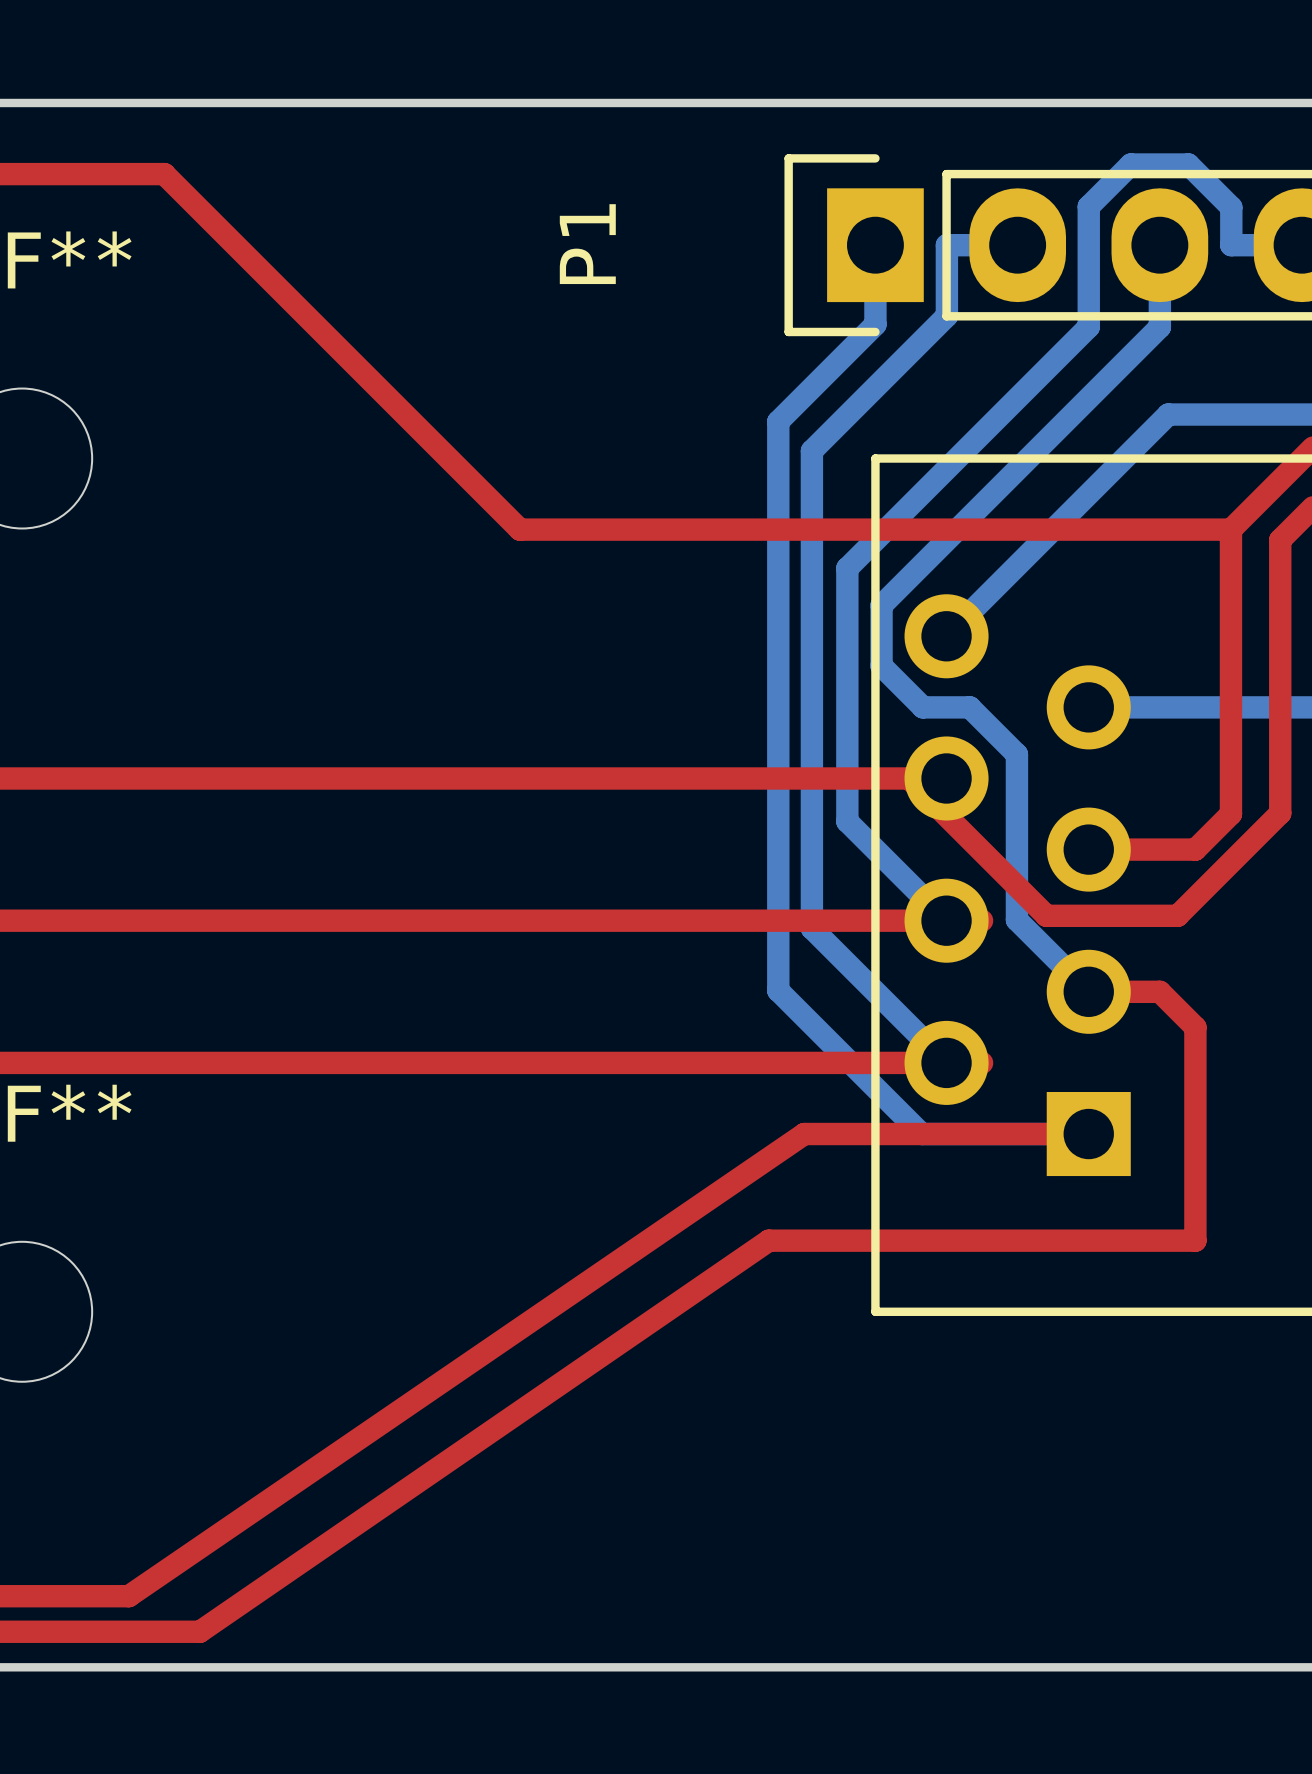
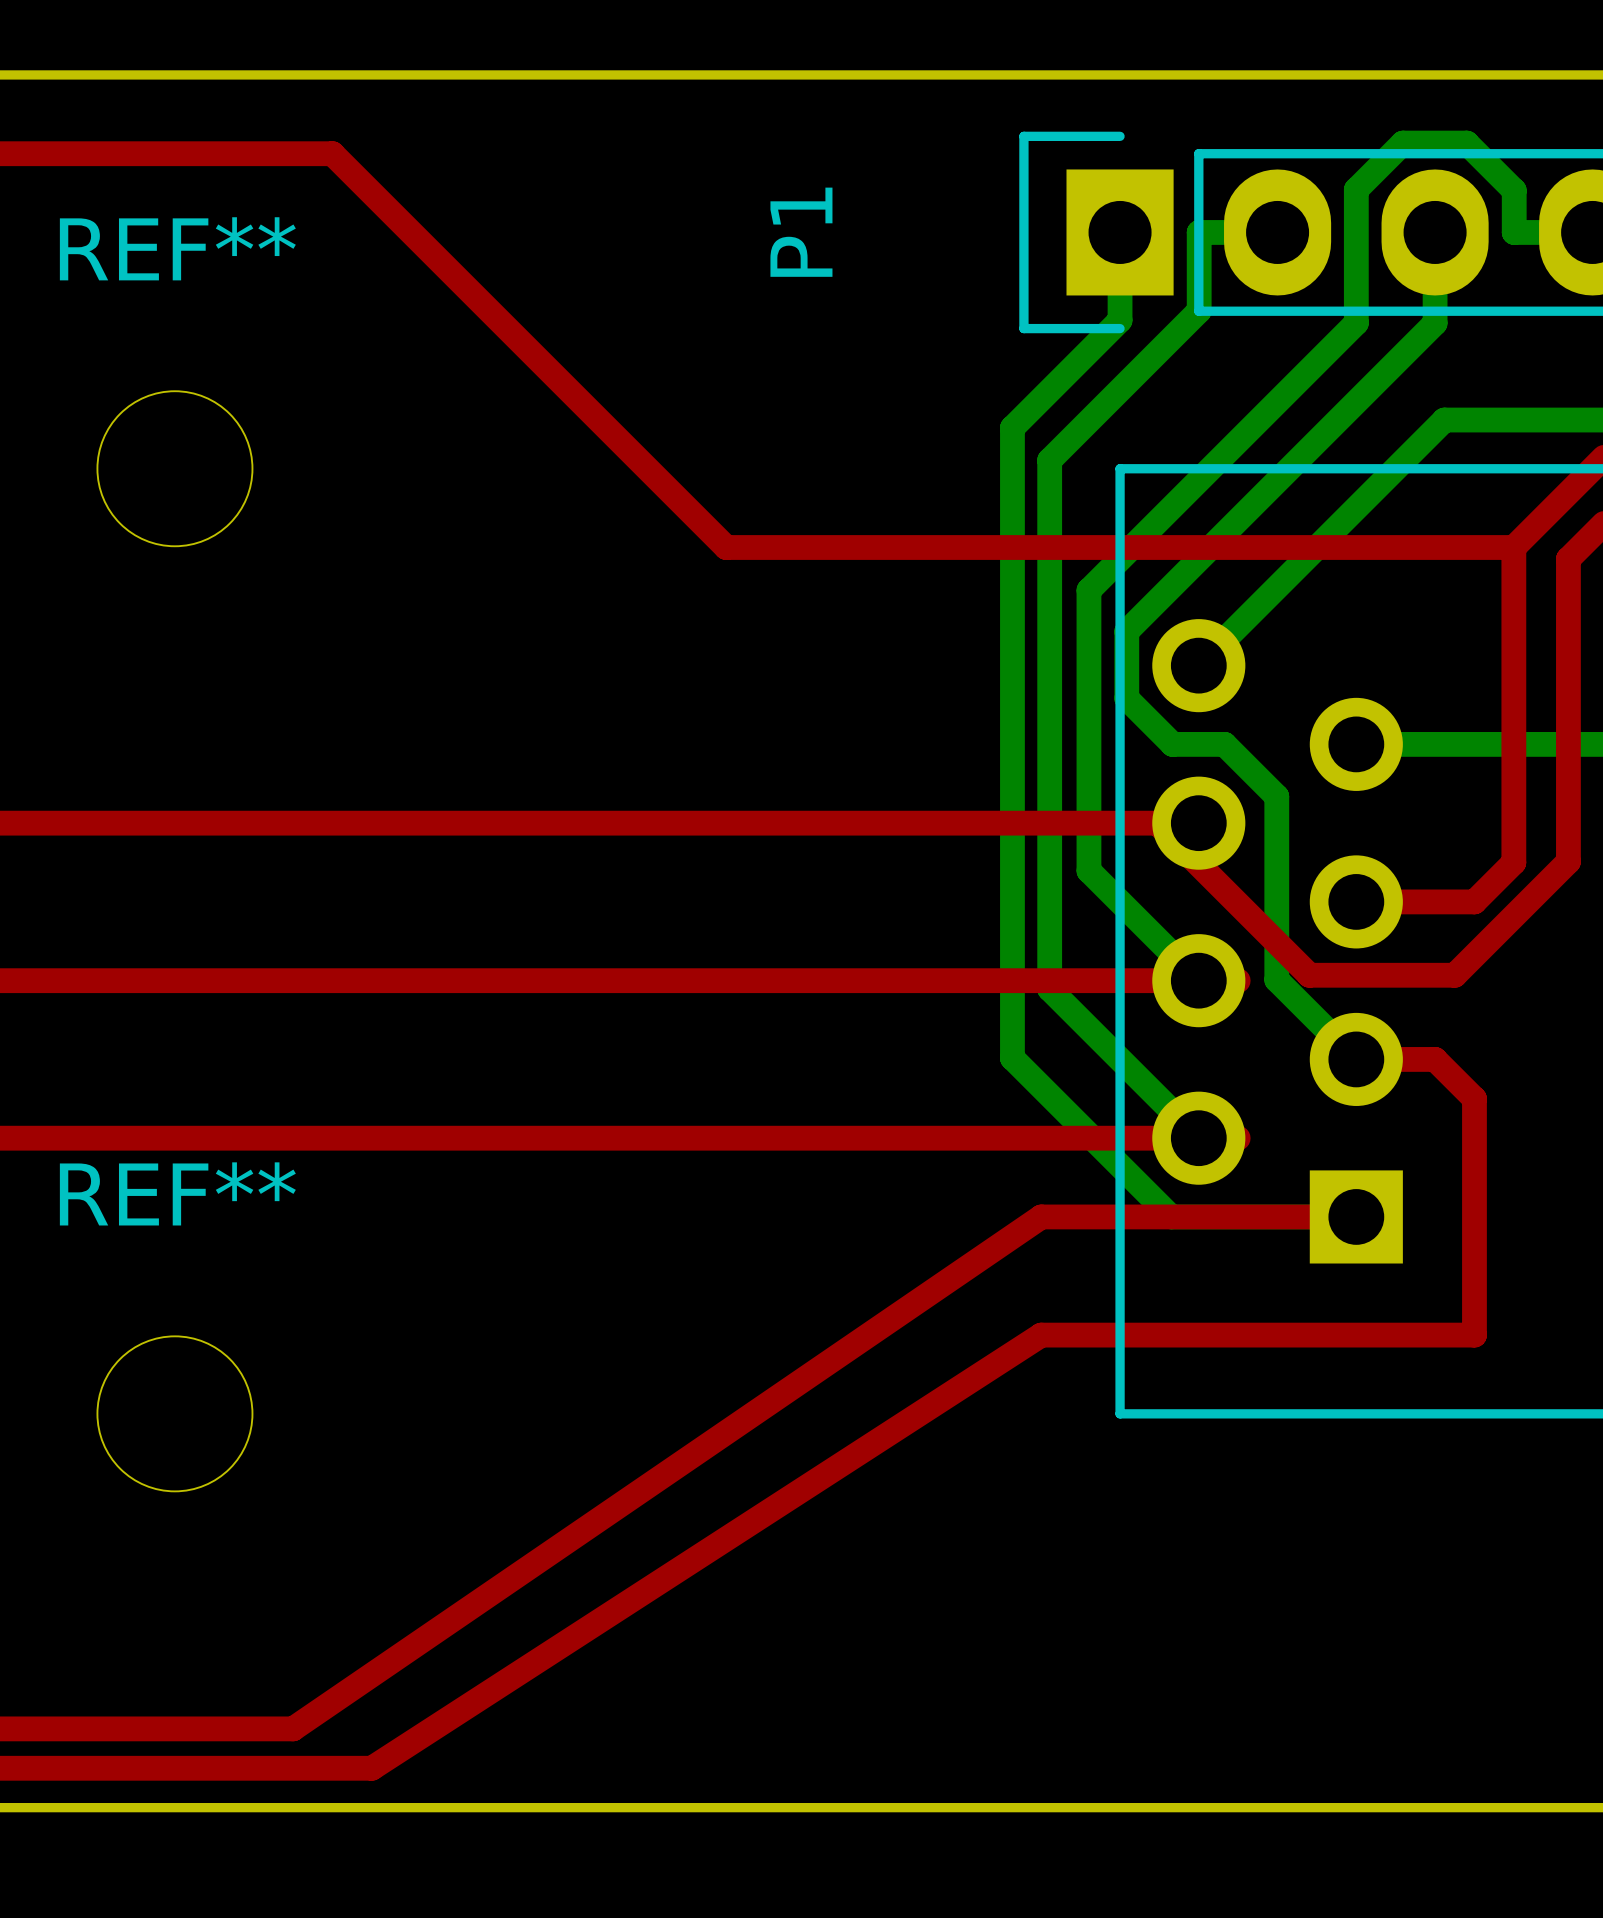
top track: (804, 1240) (768, 1240) (199, 1631) -> (1041, 1335) (371, 1768)

